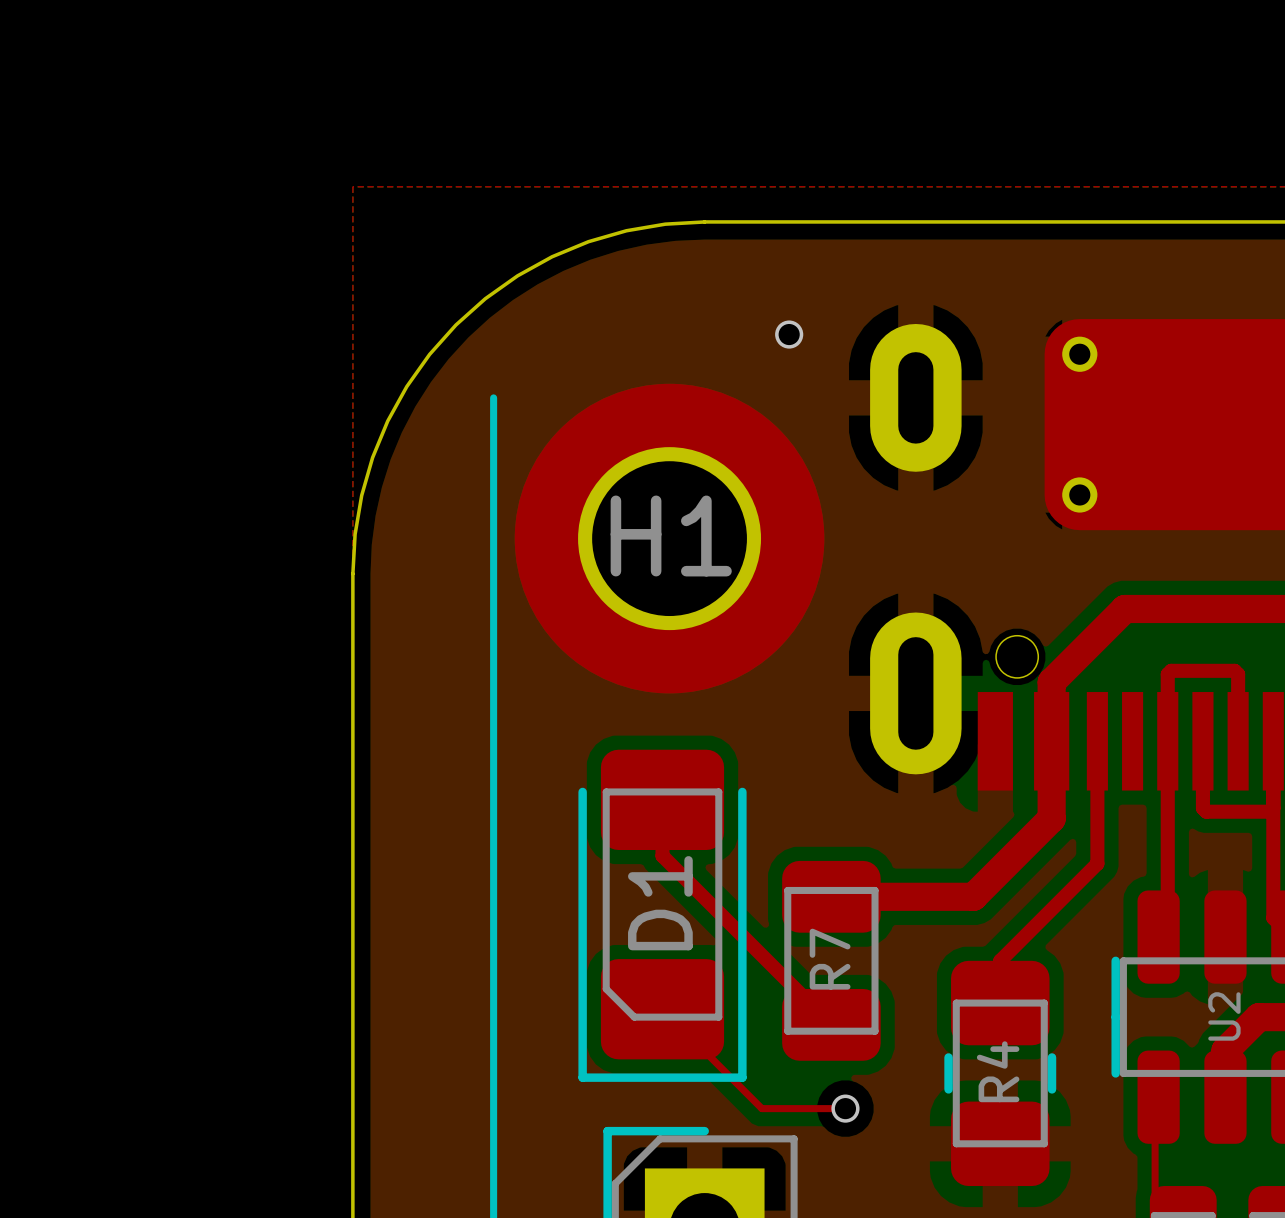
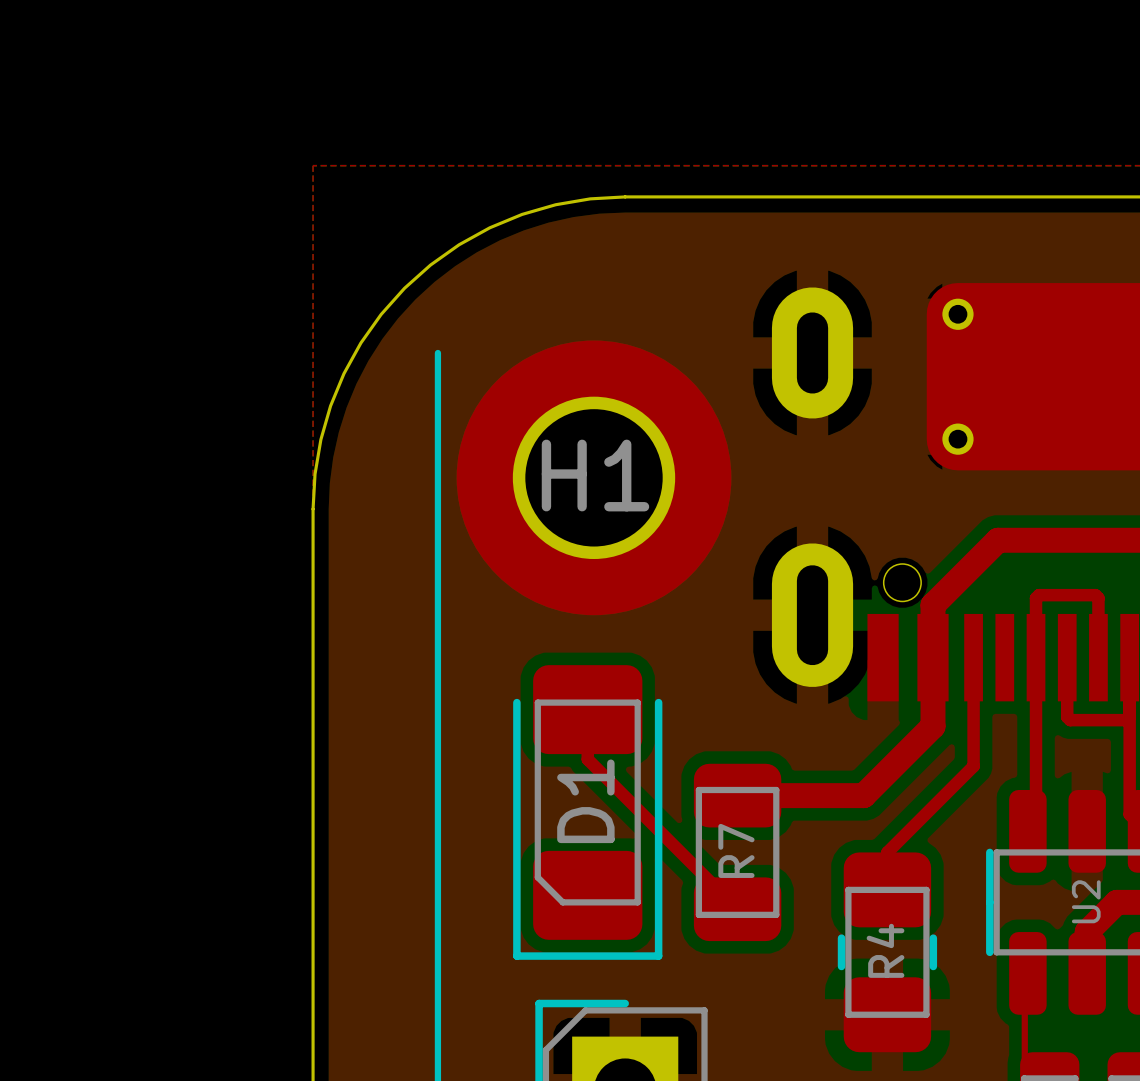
via: (789, 334) -> none
top track: (662, 1009) (761, 1108) (845, 1108) -> none
via: (845, 1108) -> none

